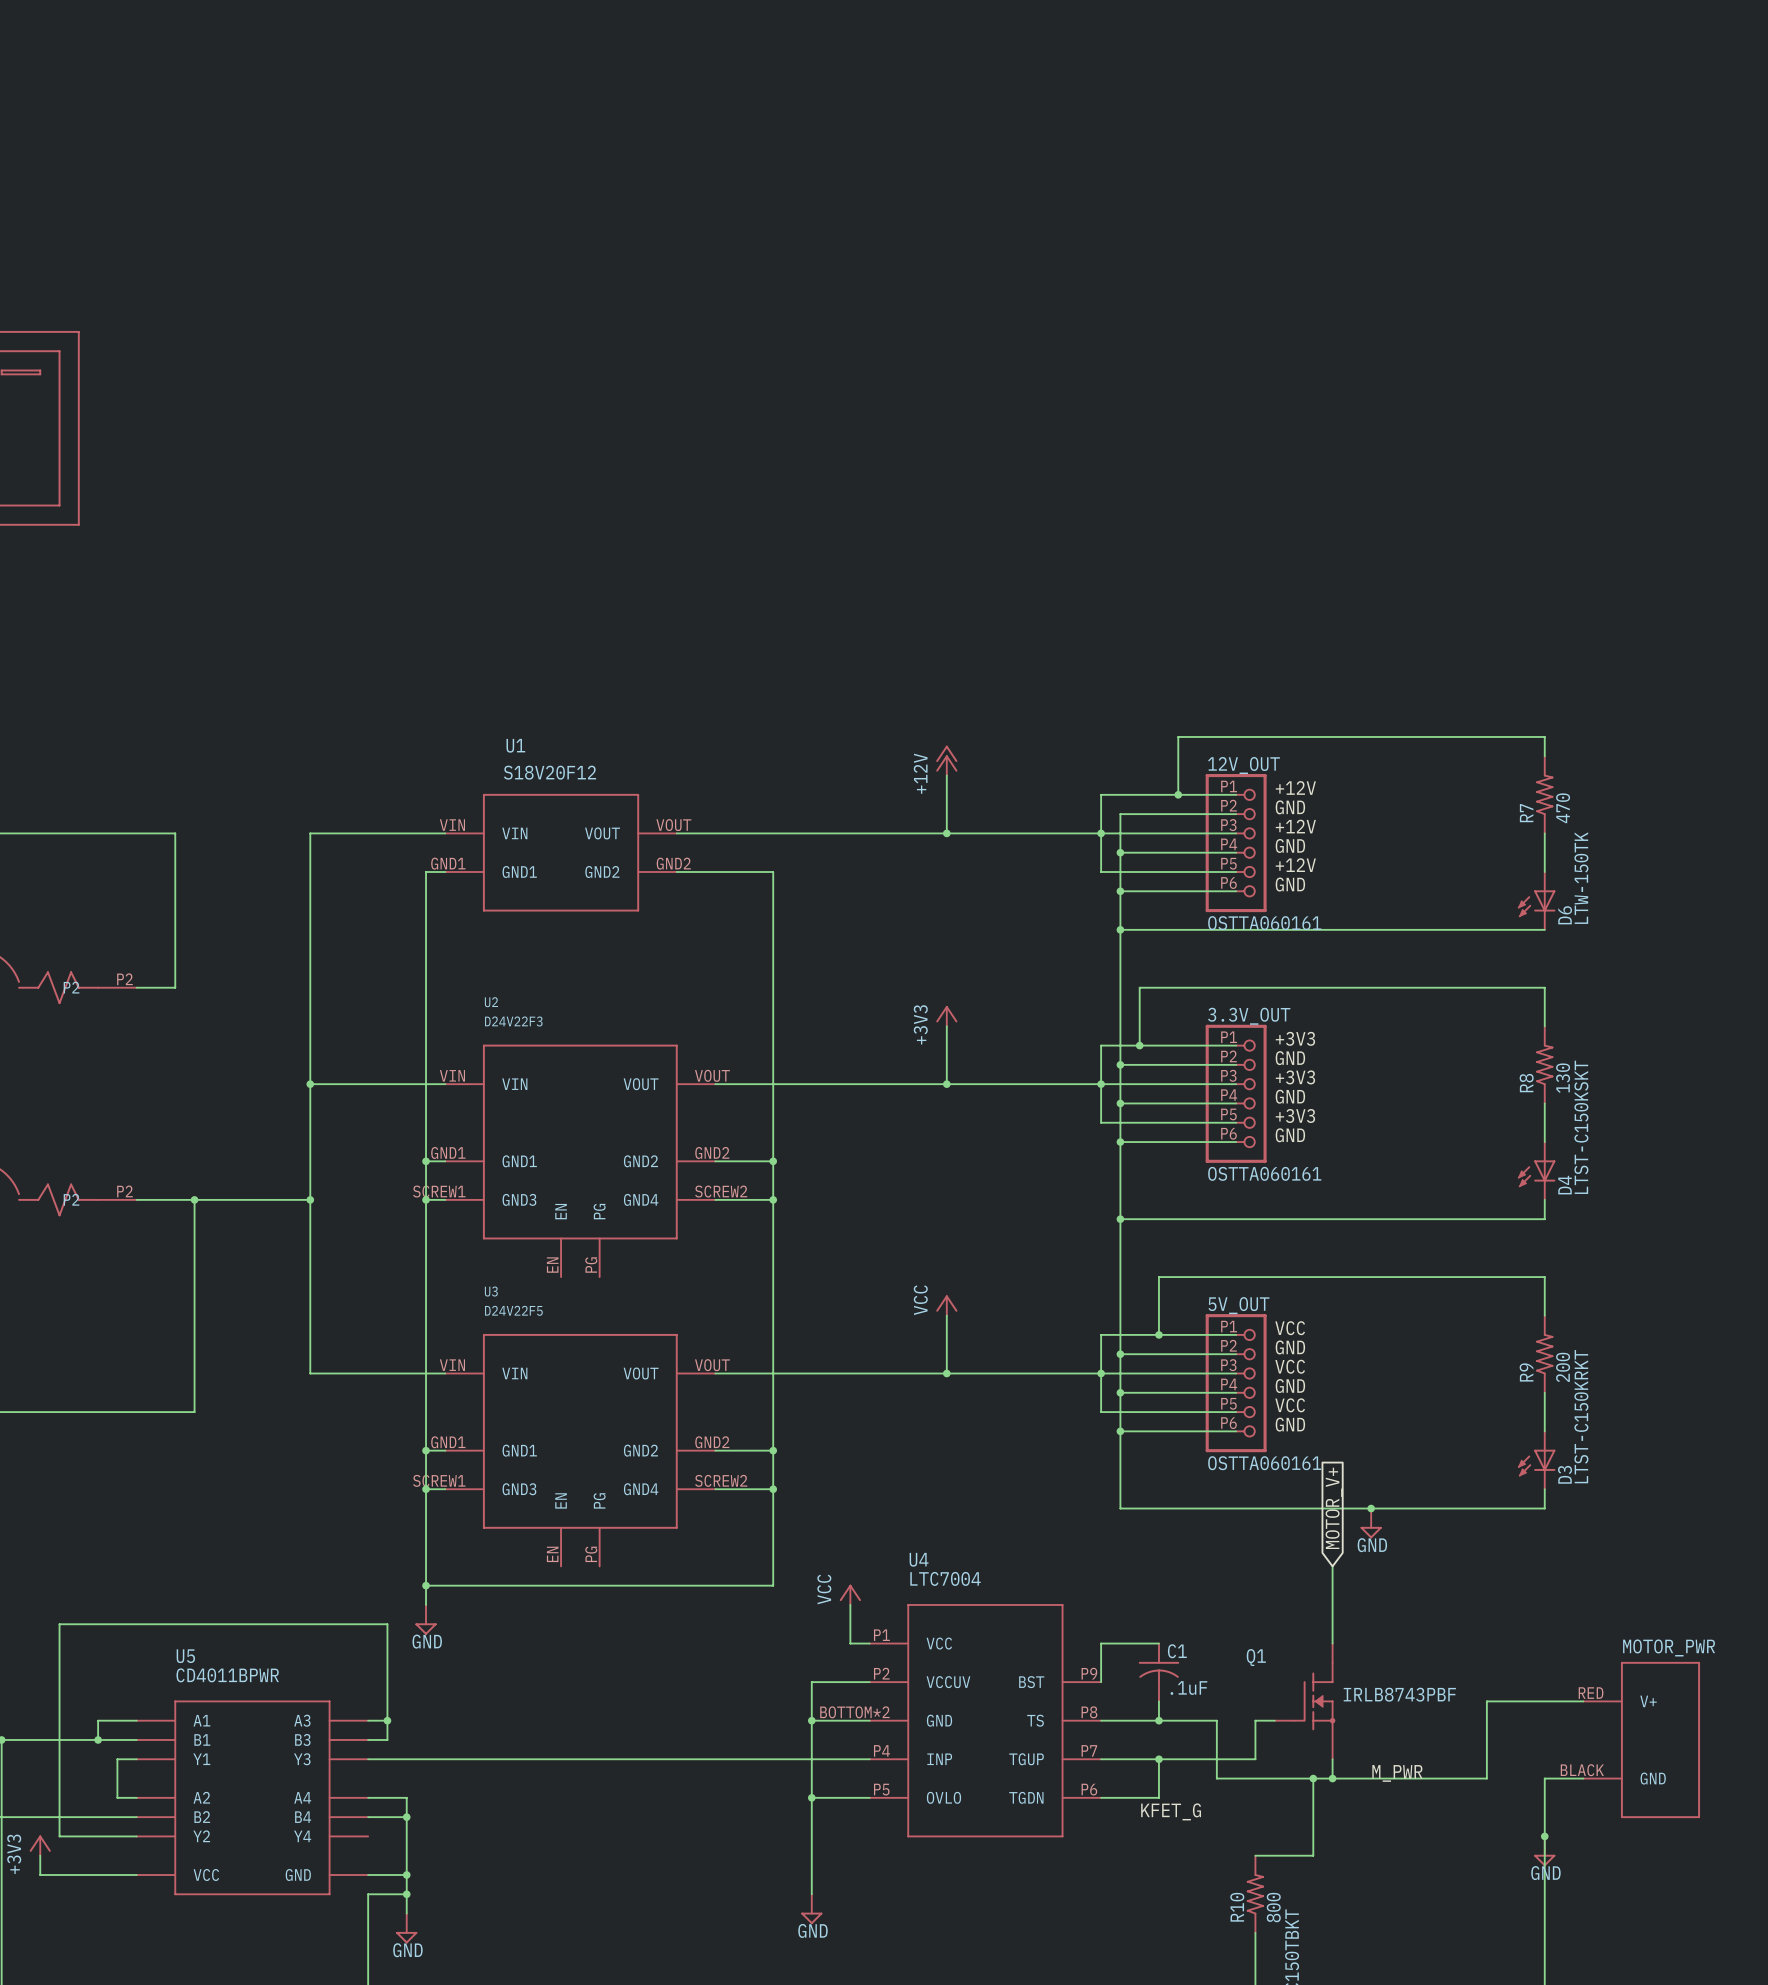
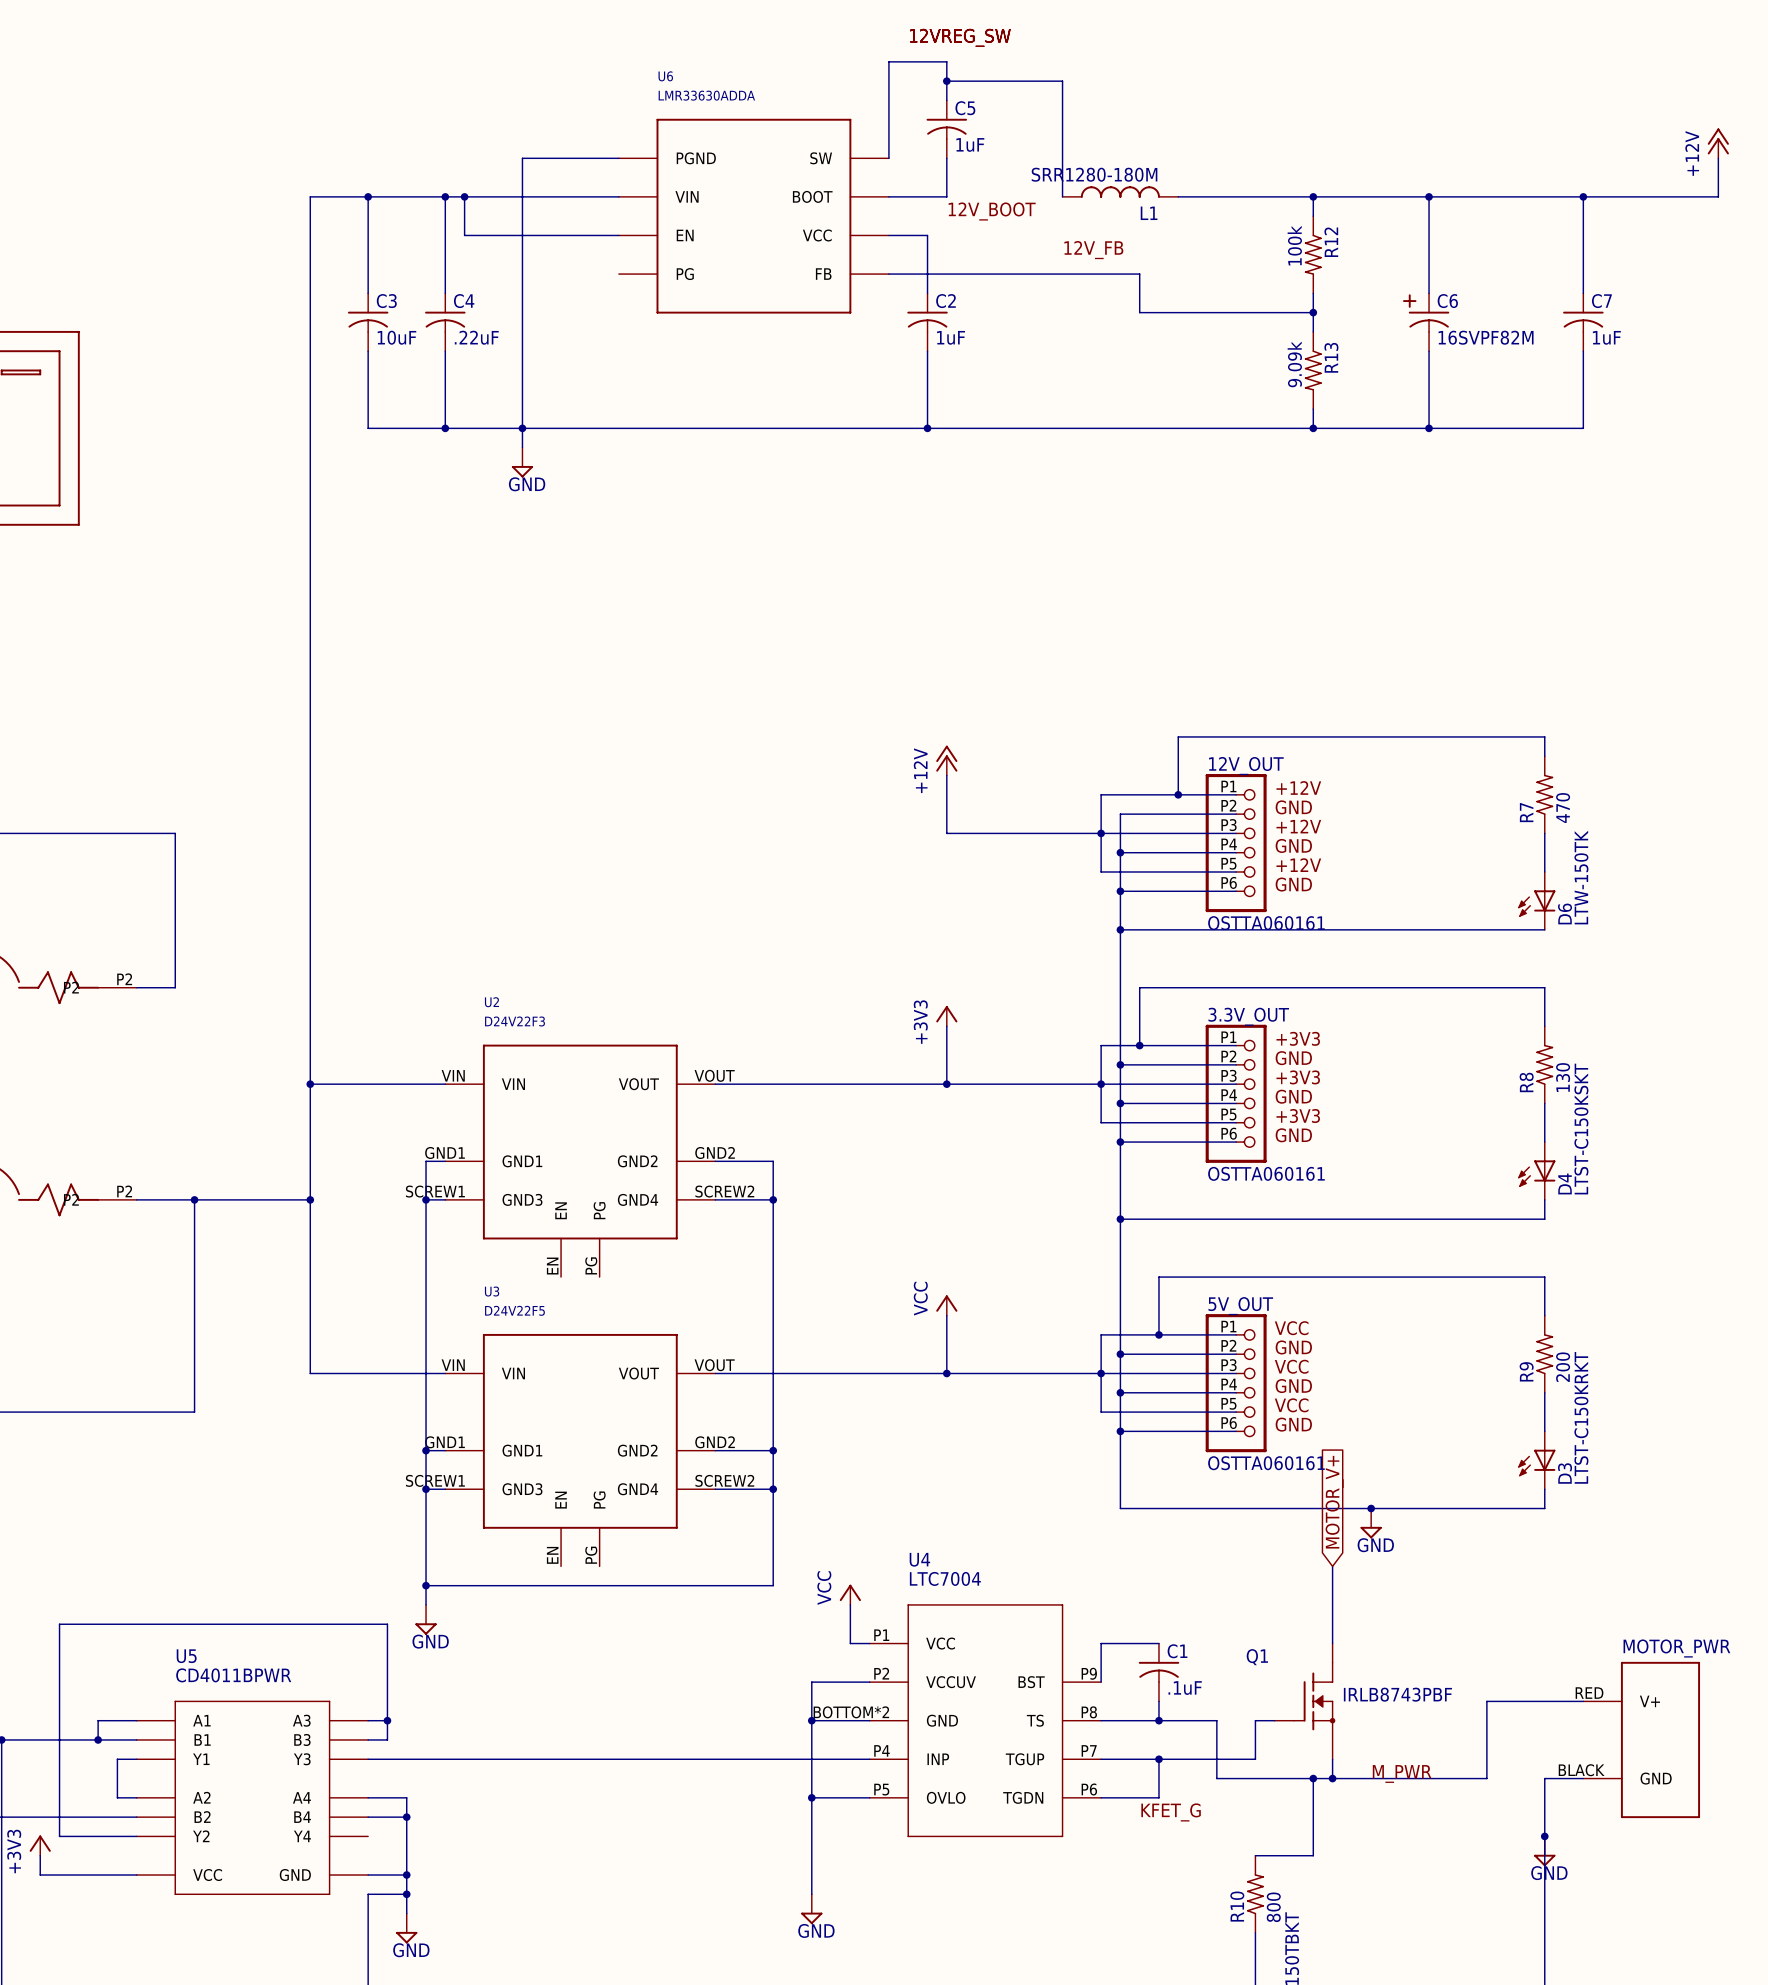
label: none -> 12VREG_SW (960, 37)
wire: none -> (946, 81) (1062, 81) (1062, 196)
junction: none -> (946, 81)
wire: none -> (946, 100) (946, 61) (888, 61) (888, 158)
C5: none -> 1uF (946, 129)
power symbol: none -> +12V (1718, 143)
wire: none -> (618, 158) (522, 158) (522, 447)
wire: none -> (946, 158) (946, 196) (888, 196)
wire: none -> (1718, 158) (1718, 196) (1178, 196)
L1: none -> SRR1280-180M (1120, 192)
wire: none -> (368, 196) (368, 293)
junction: none -> (368, 196)
wire: none -> (445, 196) (445, 293)
junction: none -> (445, 196)
wire: none -> (464, 196) (464, 235) (618, 235)
junction: none -> (464, 196)
wire: none -> (1313, 196) (1313, 216)
junction: none -> (1313, 196)
wire: none -> (1429, 196) (1429, 293)
junction: none -> (1429, 196)
wire: none -> (1583, 196) (1583, 293)
junction: none -> (1583, 196)
label: none -> 12V_BOOT (992, 211)
U6: none -> LMR33630ADDA (753, 216)
wire: none -> (888, 235) (927, 235) (927, 293)
label: none -> 12V_FB (1093, 250)
R12: none -> 100k (1313, 254)
wire: none -> (888, 274) (1139, 274) (1139, 312) (1313, 312)
wire: none -> (1313, 293) (1313, 331)
junction: none -> (1313, 312)
C3: none -> 10uF (368, 322)
C4: none -> .22uF (445, 322)
C2: none -> 1uF (927, 322)
C6: none -> 16SVPF82M (1426, 322)
C7: none -> 1uF (1583, 322)
wire: none -> (368, 351) (368, 428) (1583, 428) (1583, 351)
wire: none -> (445, 351) (445, 428)
wire: none -> (927, 351) (927, 428)
wire: none -> (1429, 351) (1429, 428)
R13: none -> 9.09k (1313, 370)
wire: none -> (1313, 409) (1313, 428)
junction: none -> (445, 428)
junction: none -> (522, 428)
junction: none -> (927, 428)
junction: none -> (1313, 428)
junction: none -> (1429, 428)
power symbol: none -> GND (522, 462)
wire: (310, 833) (445, 833) -> (310, 833) (310, 196) (618, 196)
wire: (676, 833) (946, 833) -> none
junction: (946, 833) -> none
U1: S18V20F12 (561, 852) -> none
wire: (445, 871) (426, 871) (426, 1161) -> none
wire: (676, 871) (773, 871) (773, 1161) -> none
junction: (426, 1161) -> none
junction: (773, 1161) -> none

